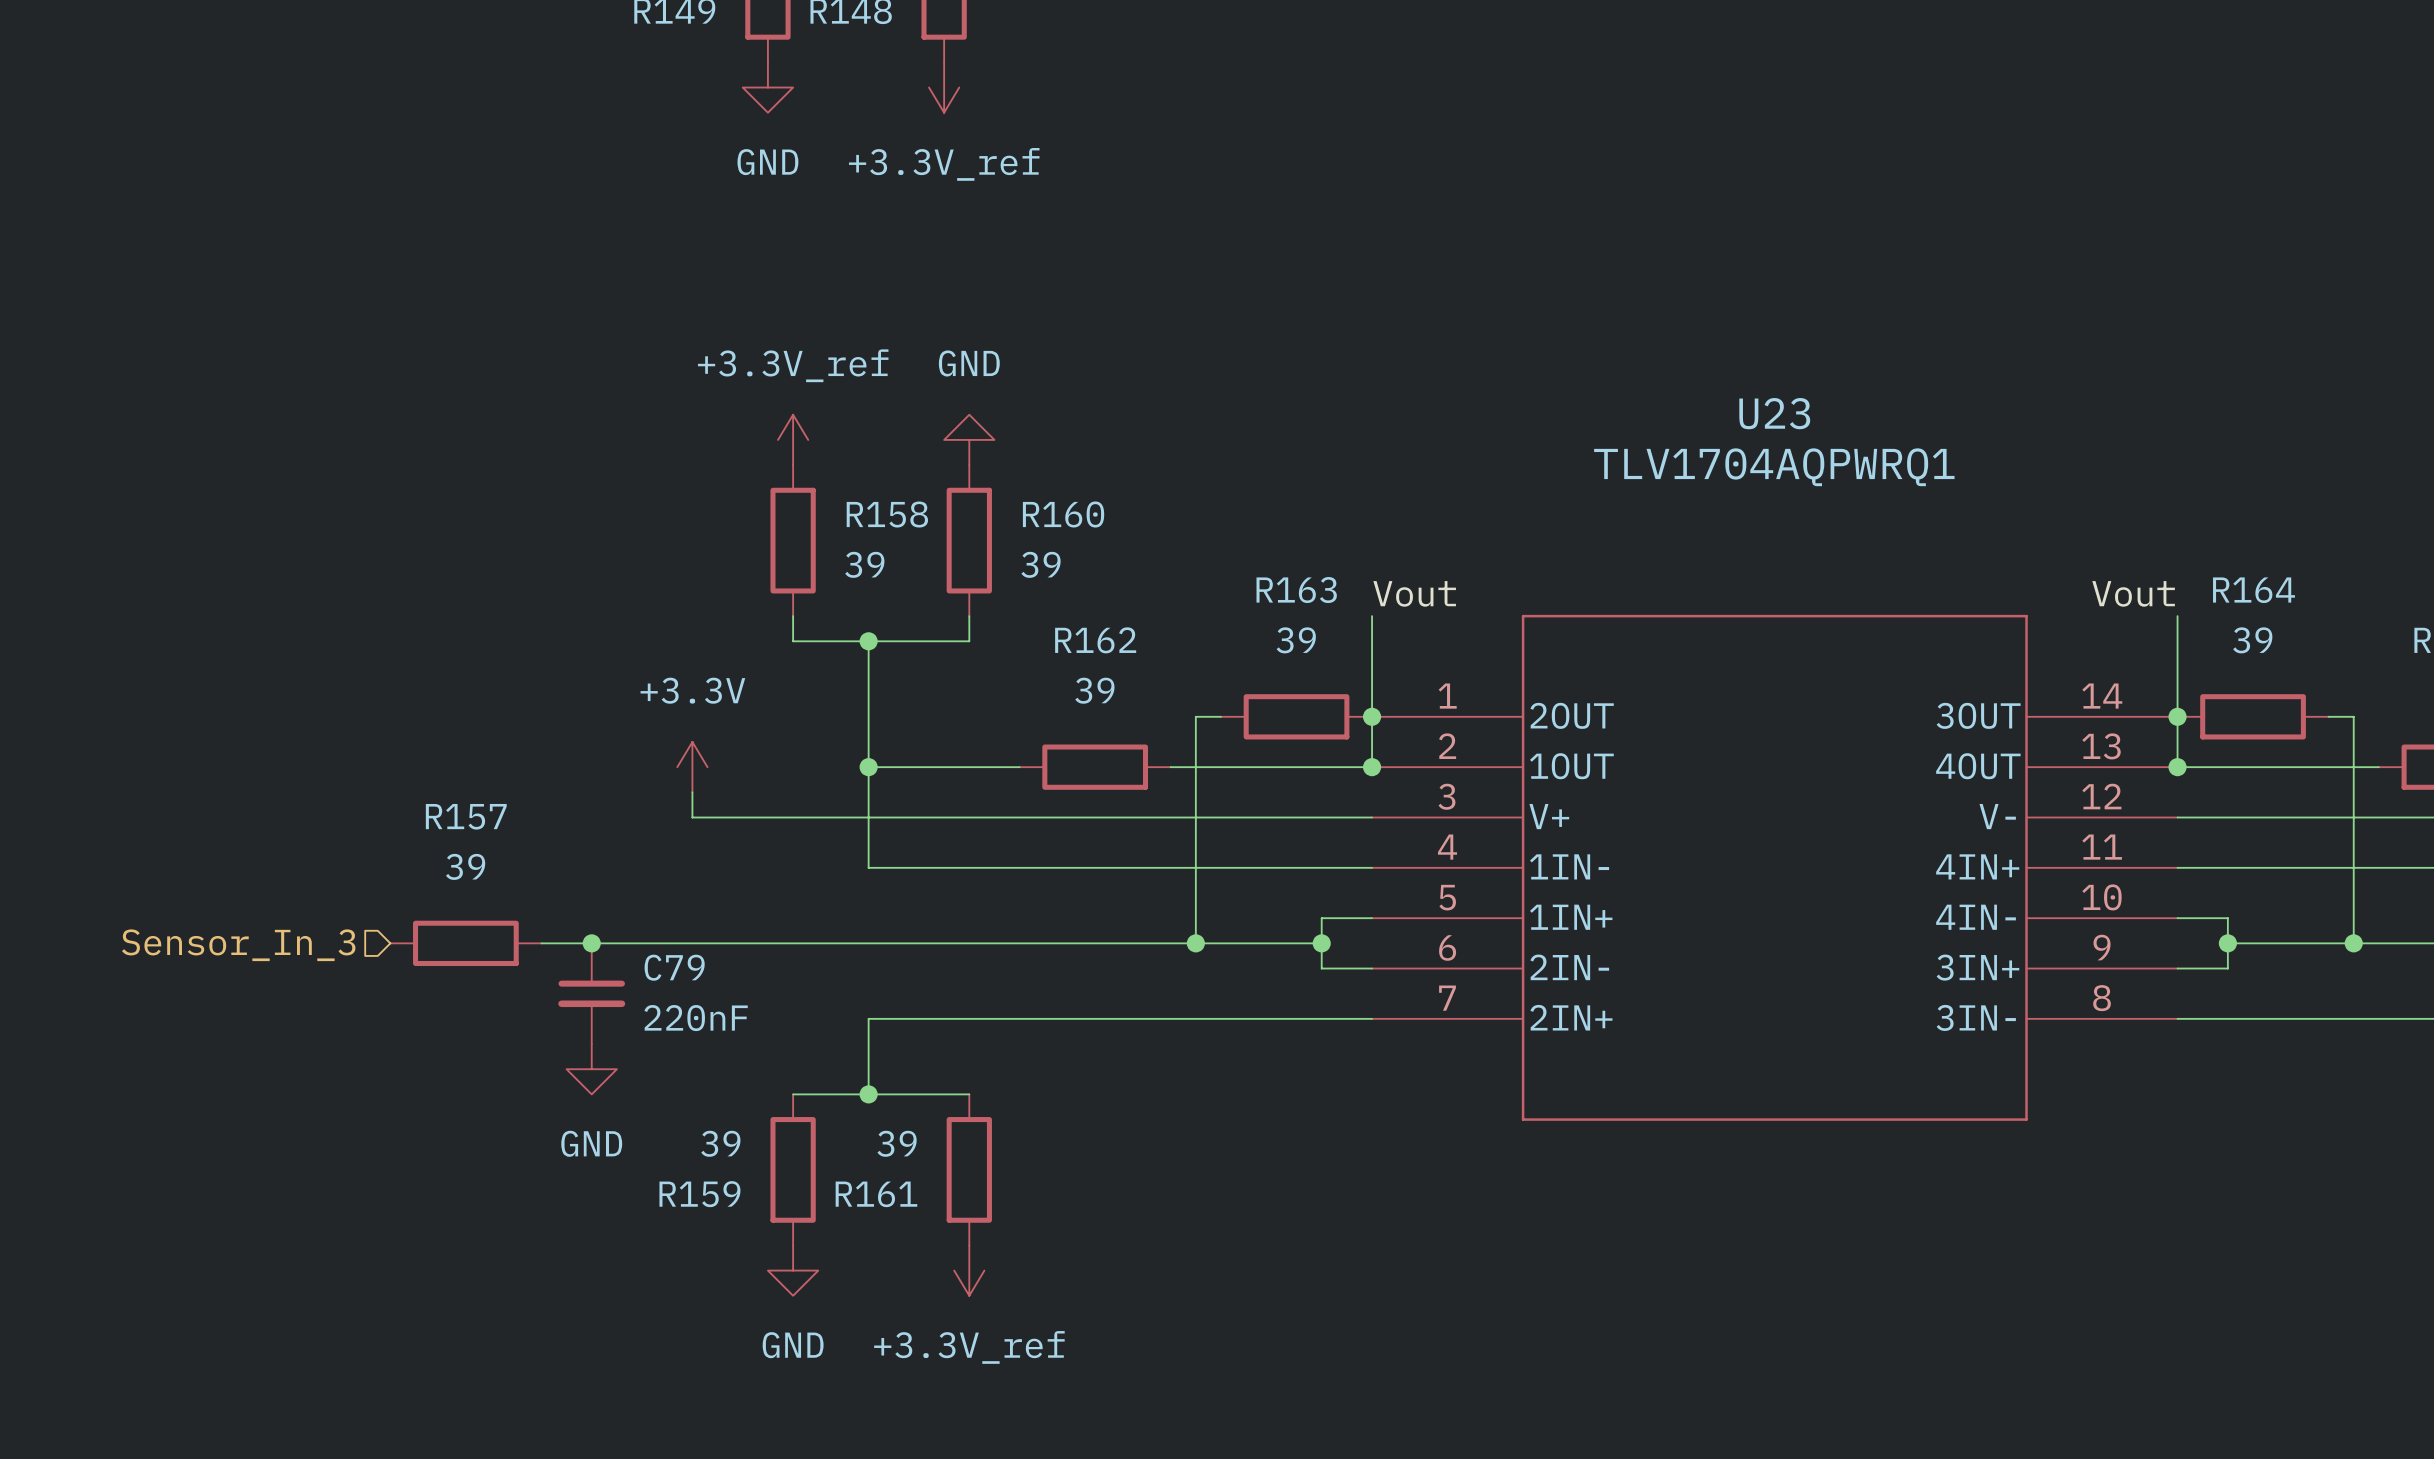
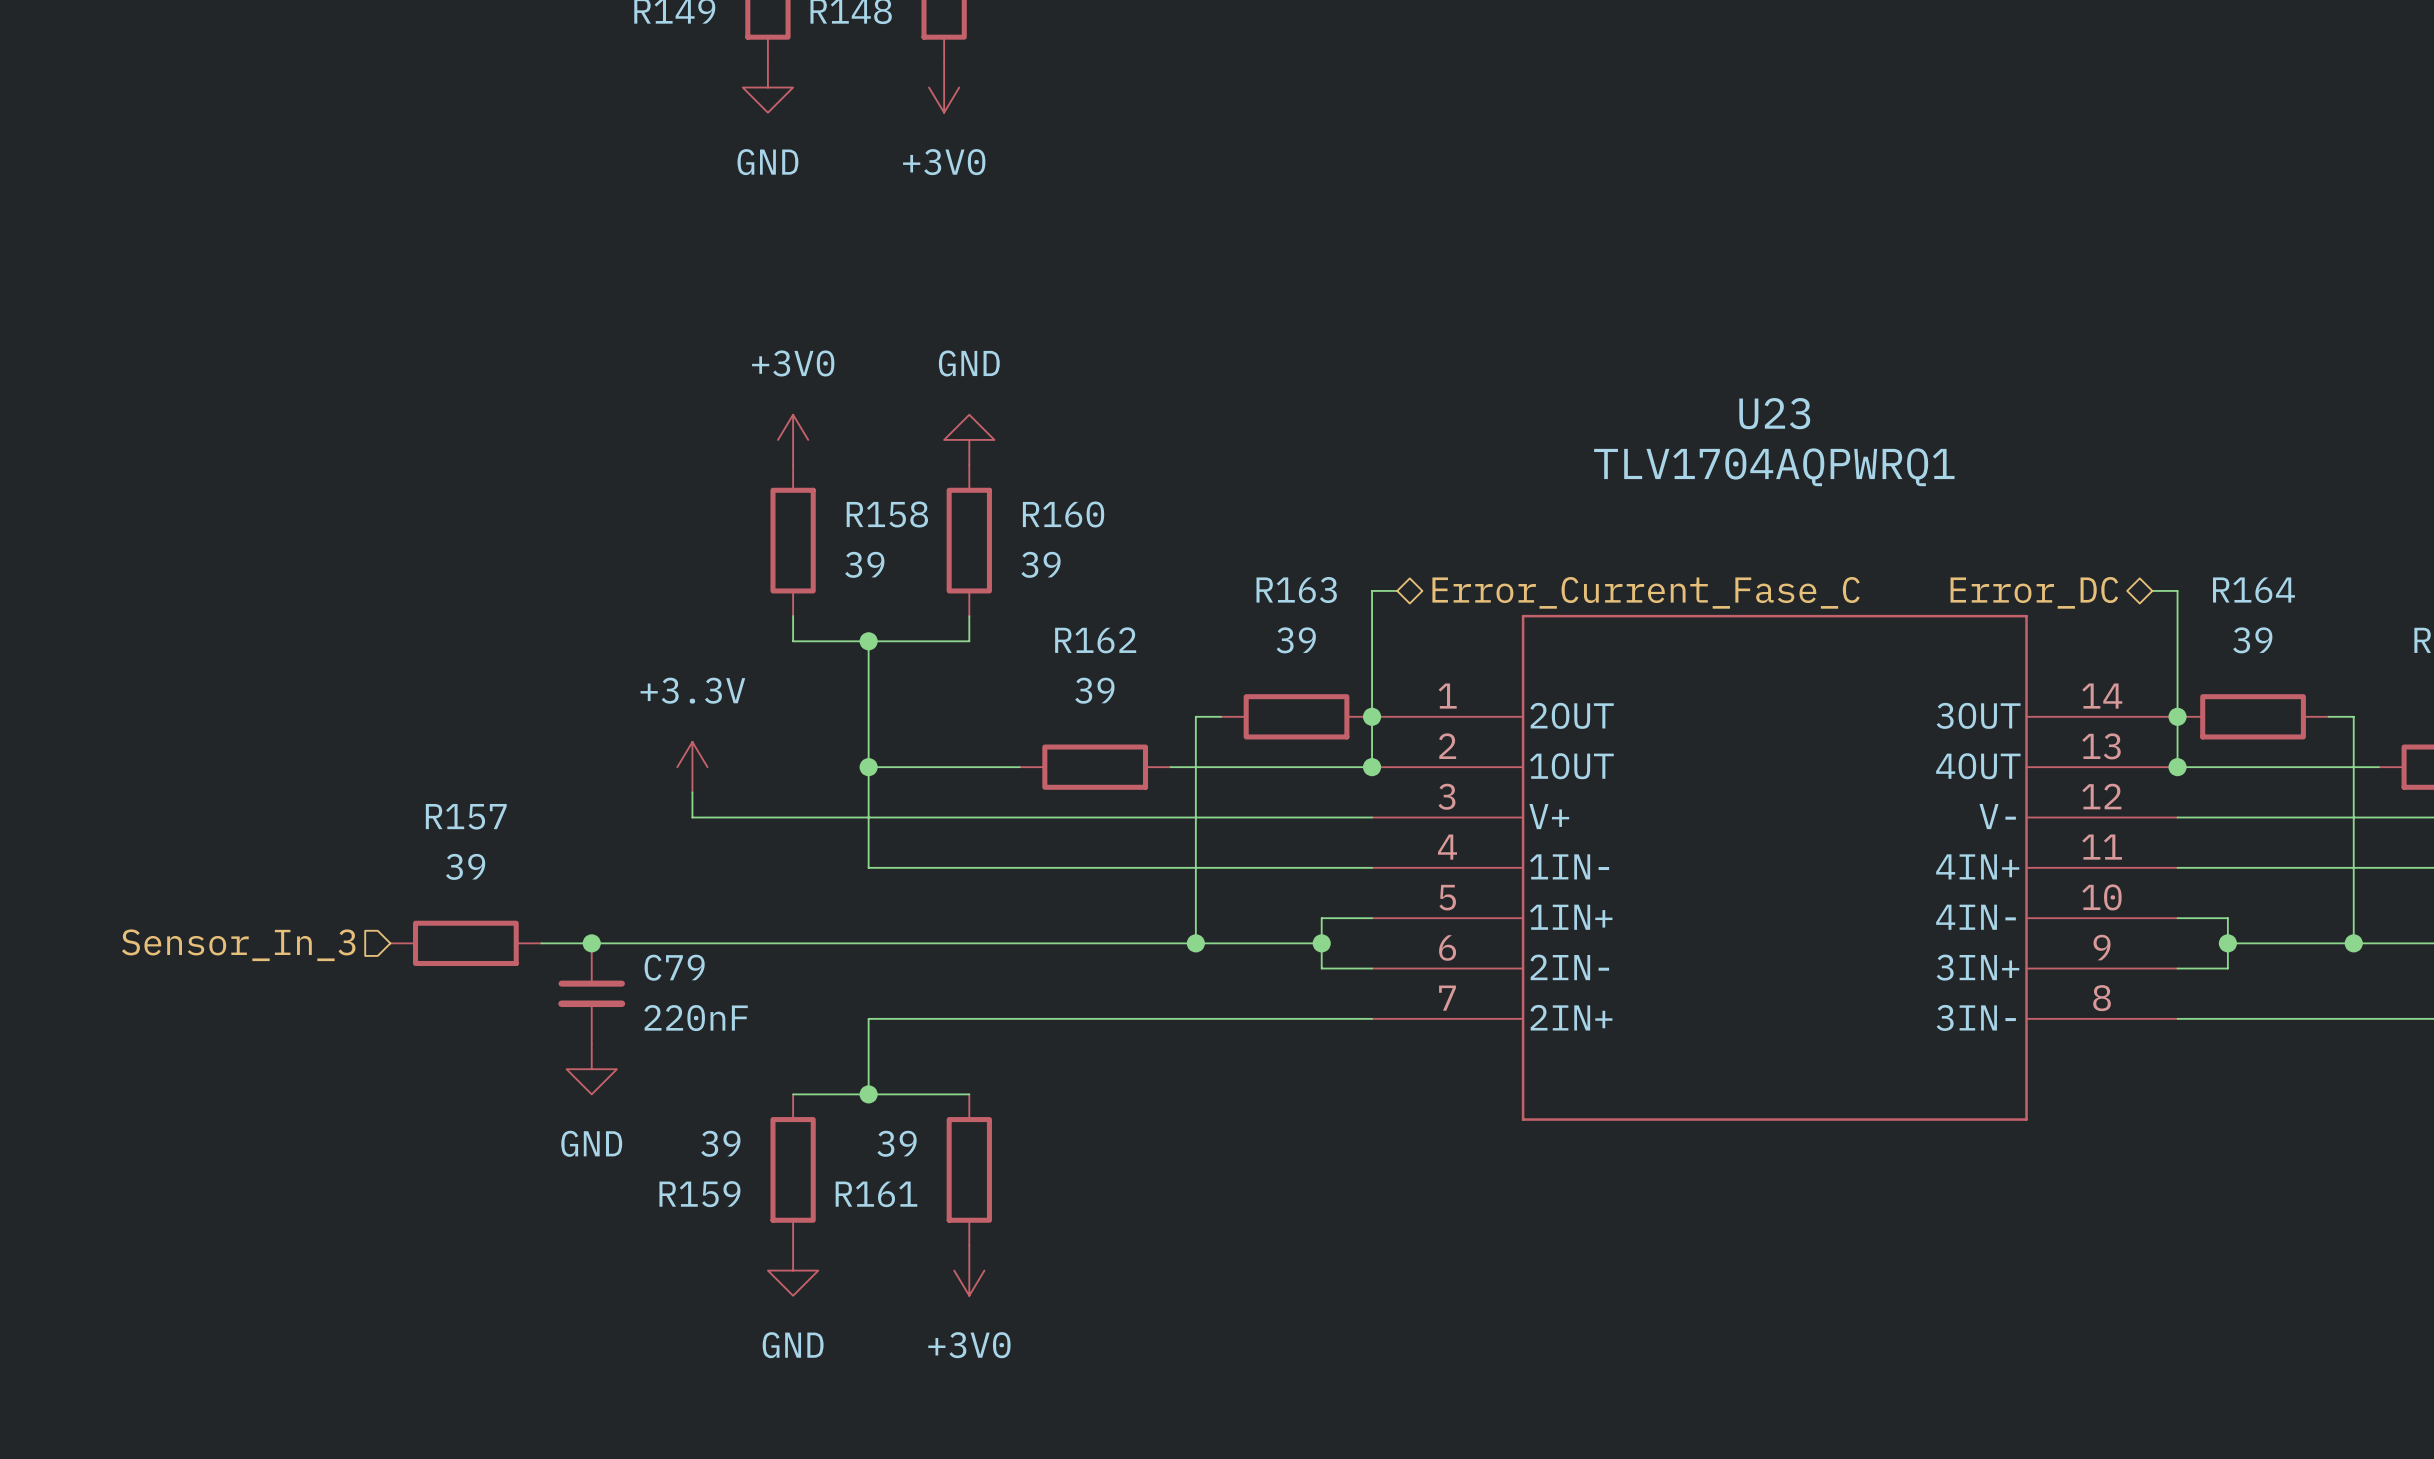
power symbol: +3.3V_ref (944, 87) -> +3V0 (944, 87)
power symbol: +3.3V_ref (793, 439) -> +3V0 (793, 439)
wire: none -> (1397, 590) (1372, 590) (1372, 616)
wire: none -> (2152, 590) (2177, 590) (2177, 616)
hierarchical label: none -> Error_Current_Fase_C (1646, 592)
hierarchical label: none -> Error_DC (2034, 592)
label: Vout (1414, 593) -> none
label: Vout (2133, 593) -> none
power symbol: +3.3V_ref (969, 1270) -> +3V0 (969, 1270)

